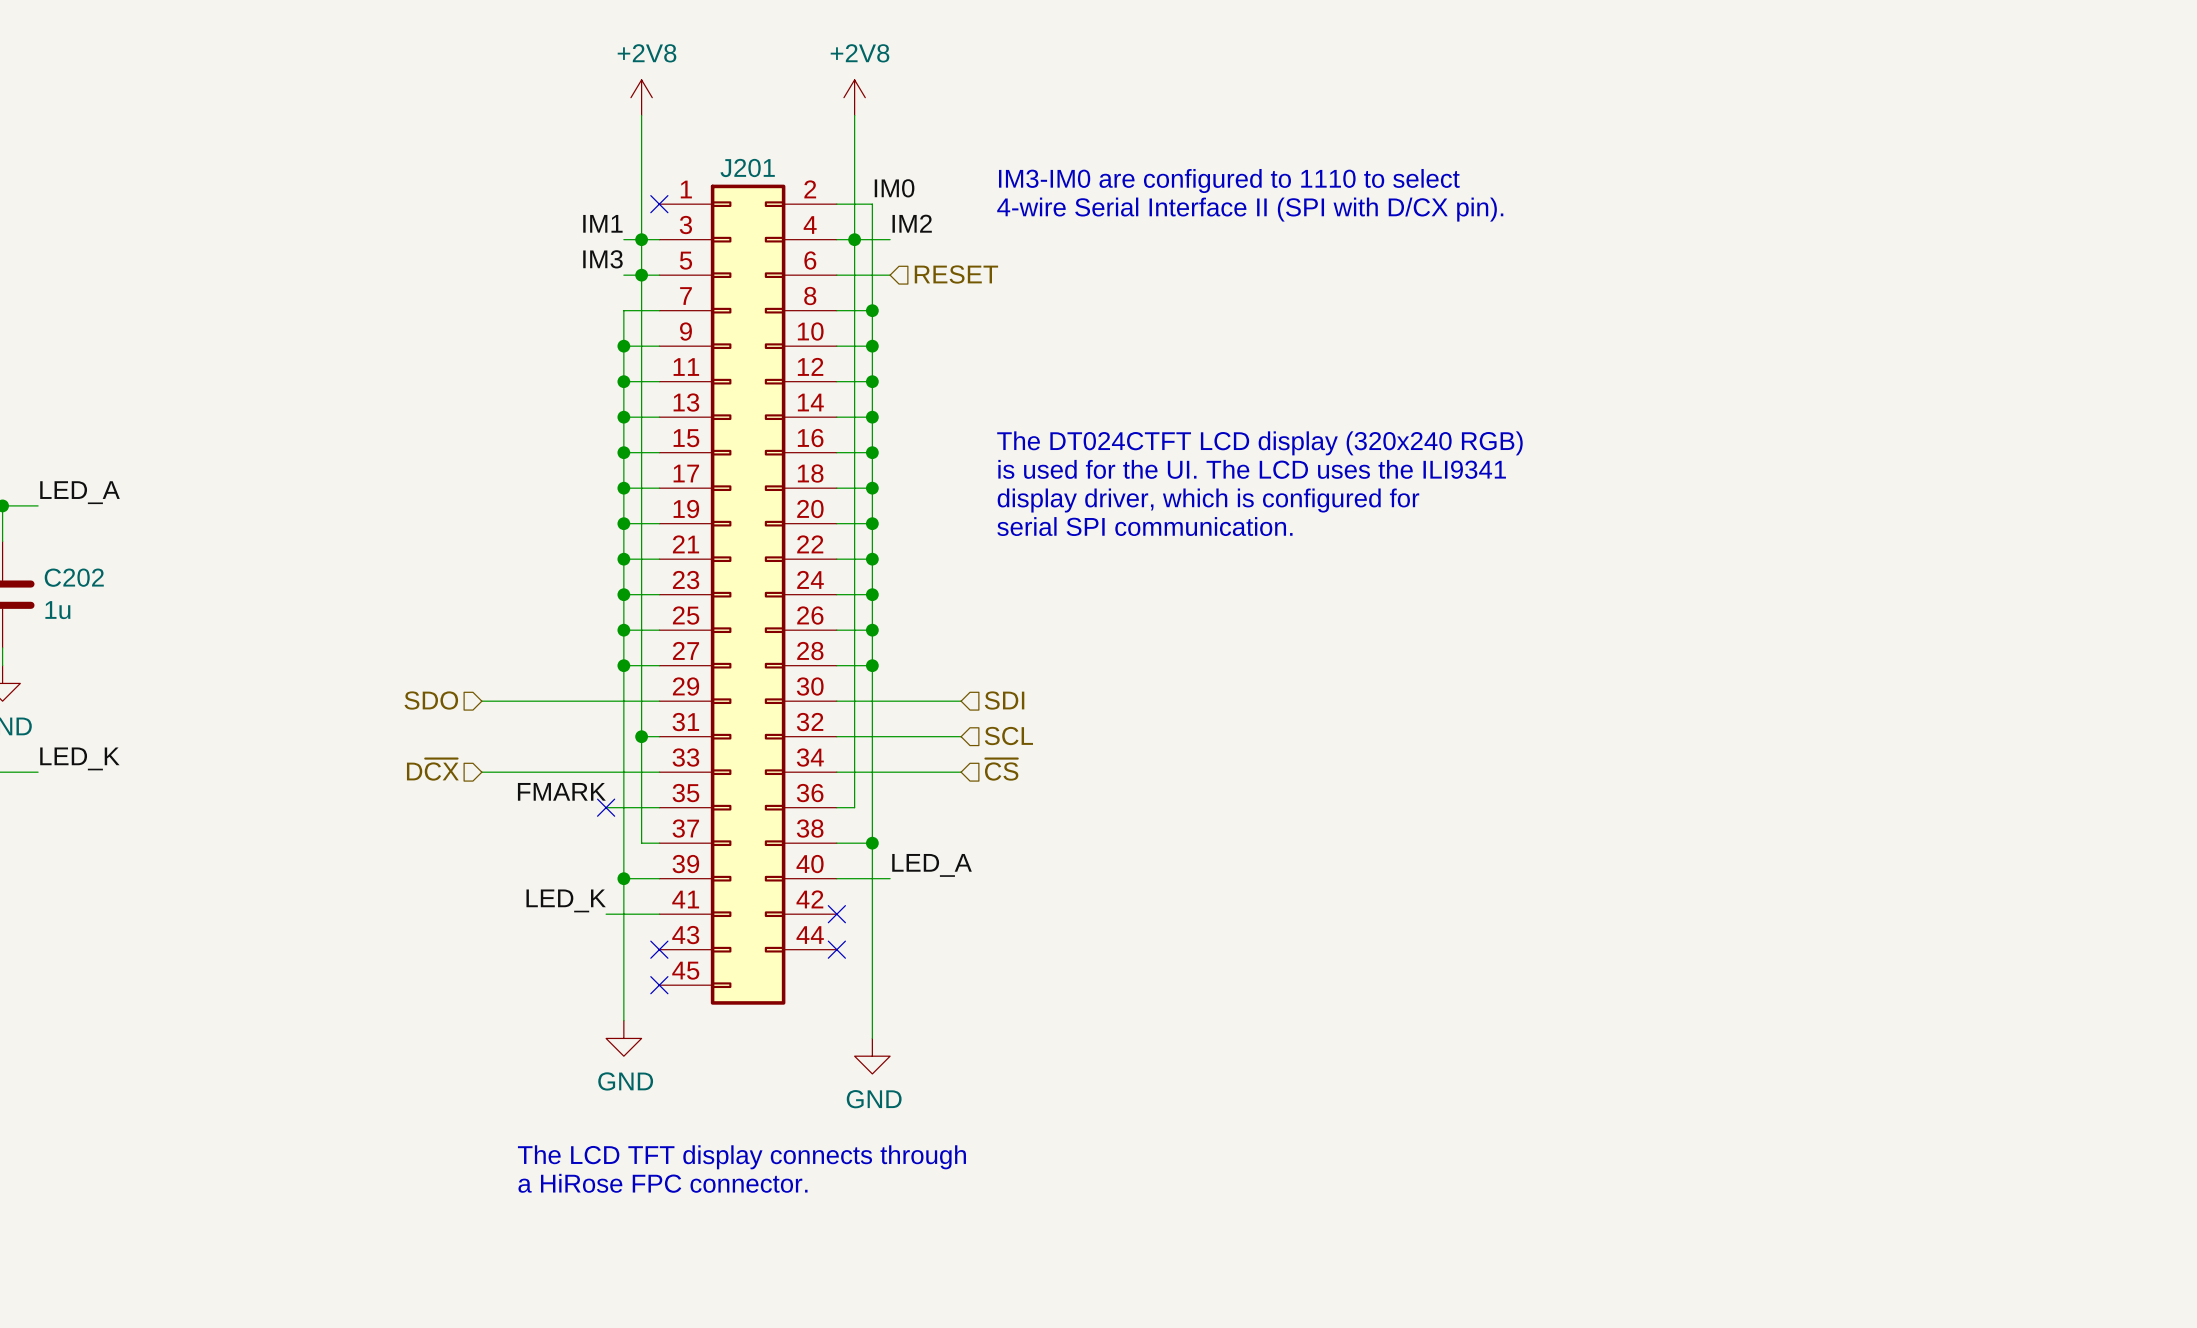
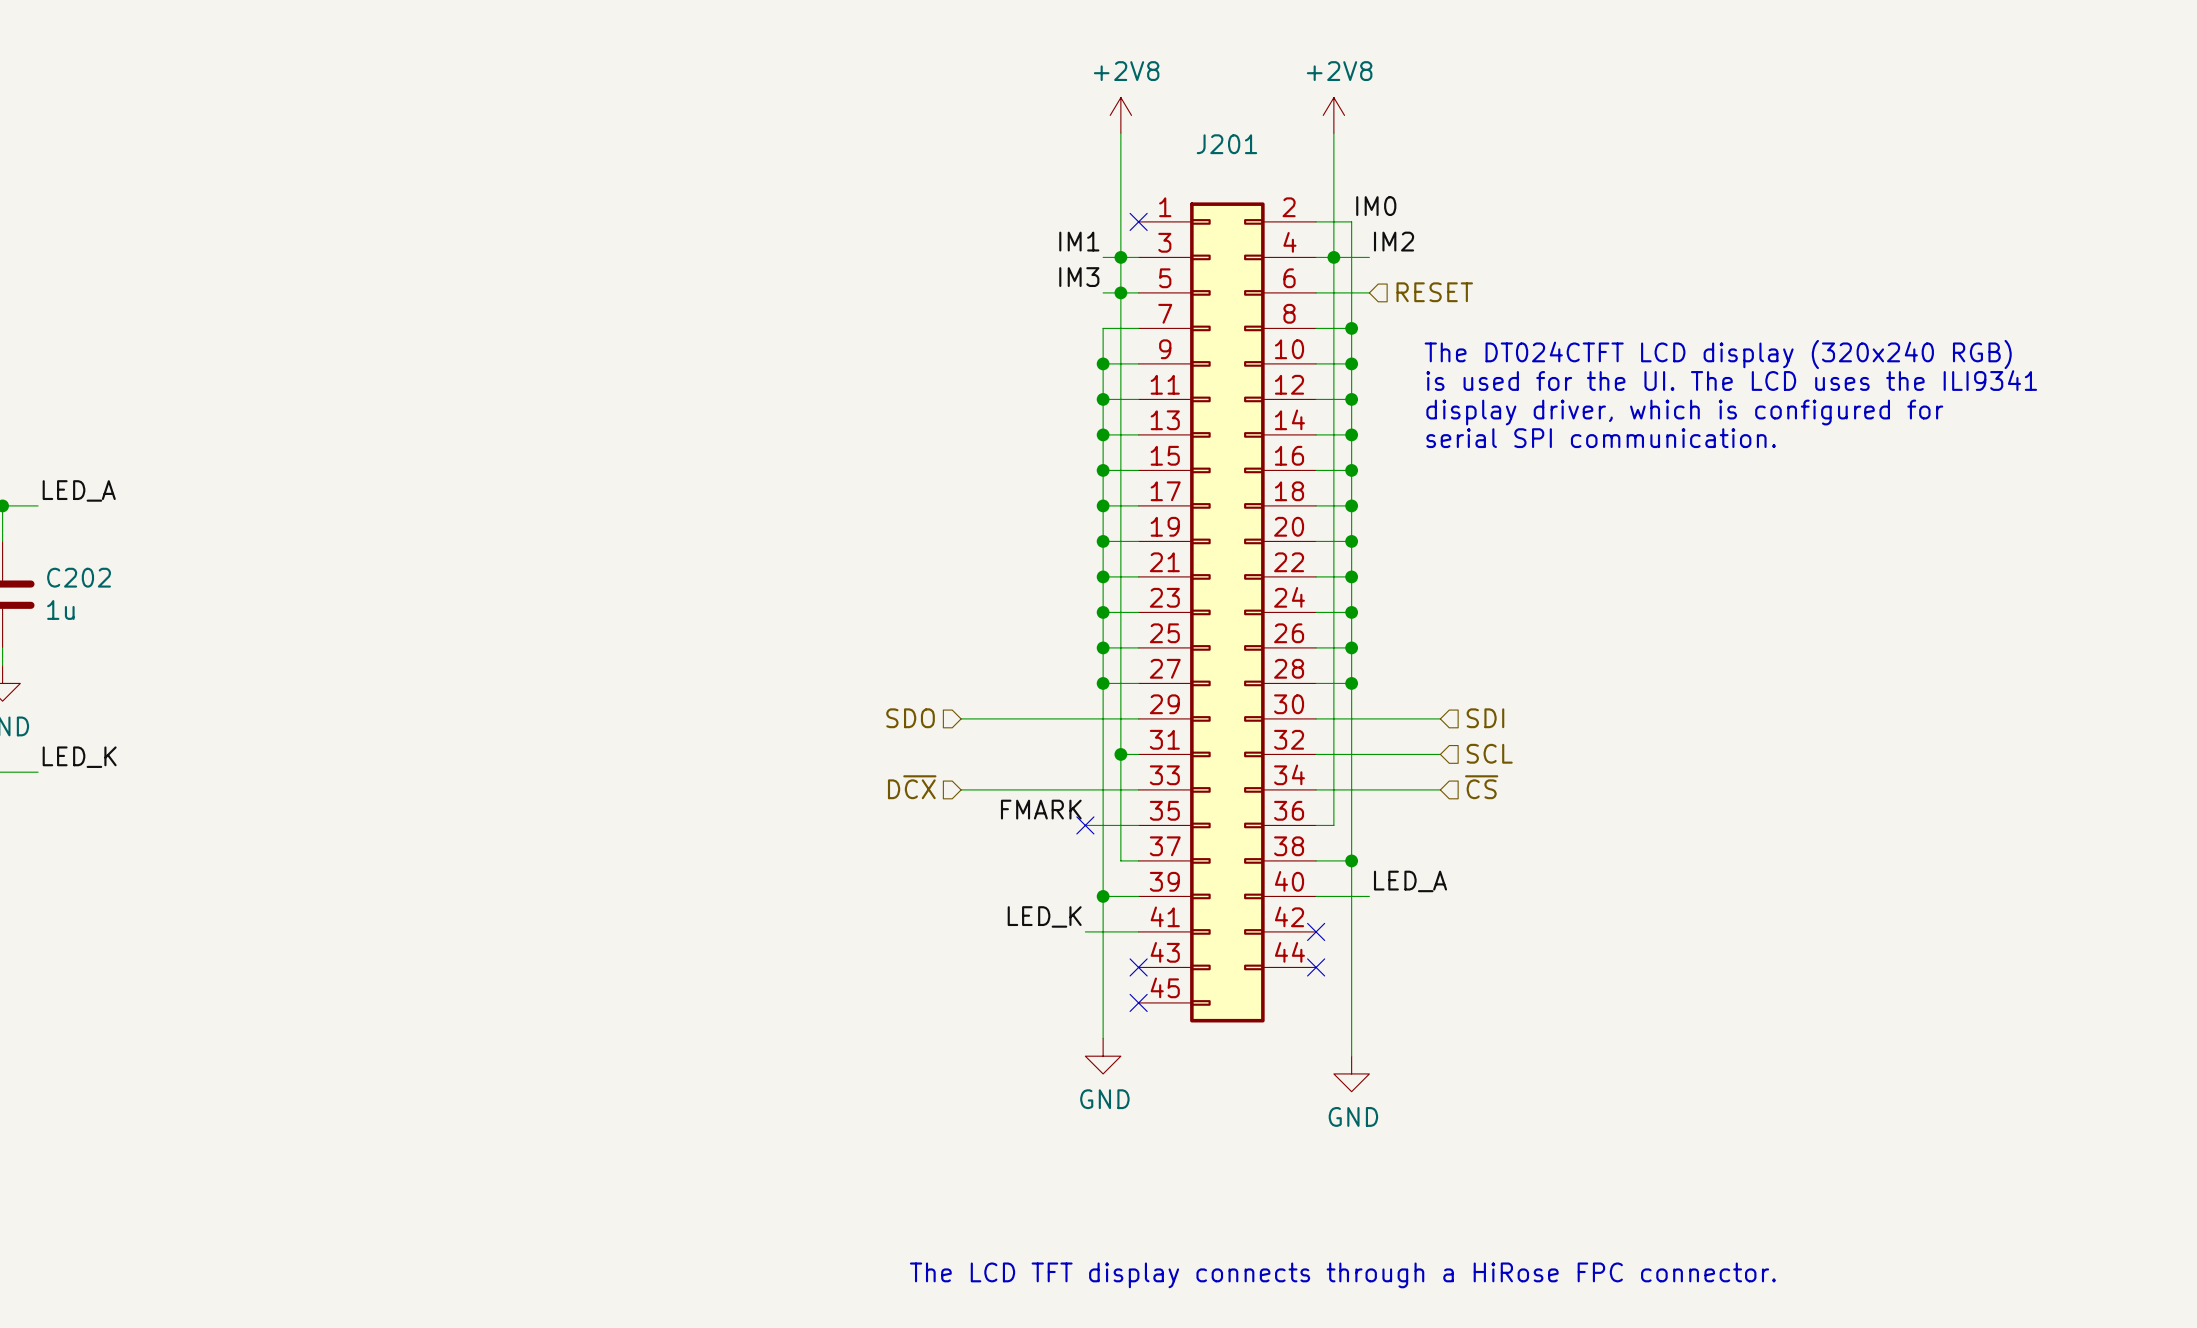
power symbol: +2V8 (641, 97) -> none
power symbol: +2V8 (854, 97) -> none
wire: (641, 115) (641, 843) (659, 843) -> none
wire: (854, 115) (854, 807) (836, 807) -> none
power symbol: none -> +2V8 (1120, 115)
power symbol: none -> +2V8 (1333, 115)
wire: none -> (1120, 133) (1120, 860) (1138, 860)
wire: none -> (1333, 133) (1333, 825) (1316, 825)
J201 name position: J201 (747, 167) -> J201 (1226, 144)
text: IM3-IM0 are configured to 1110 to select (1229, 181) -> none
label: IM0 (894, 188) -> none
no-connect mark: (659, 204) -> none
wire: (836, 204) (872, 204) (872, 1038) -> none
label: none -> IM0 (1376, 206)
text: 4-wire Serial Interface II (SPI with D/CX pin). (1250, 209) -> none
no-connect mark: none -> (1138, 221)
wire: none -> (1316, 221) (1351, 221) (1351, 1056)
label: IM1 (602, 223) -> none
label: IM2 (912, 223) -> none
wire: (623, 239) (659, 239) -> none
junction: (641, 239) -> none
wire: (836, 239) (890, 239) -> none
junction: (854, 239) -> none
label: none -> IM1 (1079, 241)
label: none -> IM2 (1394, 241)
wire: none -> (1103, 257) (1138, 257)
junction: none -> (1120, 257)
wire: none -> (1316, 257) (1369, 257)
junction: none -> (1333, 257)
label: IM3 (602, 259) -> none
hierarchical label: RESET (956, 274) -> none
wire: (623, 275) (659, 275) -> none
junction: (641, 275) -> none
wire: (836, 275) (890, 275) -> none
label: none -> IM3 (1079, 277)
wire: none -> (1103, 292) (1138, 292)
junction: none -> (1120, 292)
wire: none -> (1316, 292) (1369, 292)
hierarchical label: none -> RESET (1434, 292)
wire: (659, 310) (623, 310) (623, 1020) -> none
wire: (836, 310) (872, 310) -> (1103, 363) (1138, 363)
junction: (872, 310) -> none
wire: none -> (1138, 328) (1103, 328) (1103, 1038)
wire: none -> (1316, 328) (1351, 328)
junction: none -> (1351, 328)
wire: (623, 346) (659, 346) -> none
junction: (623, 346) -> none
wire: (836, 346) (872, 346) -> (1103, 399) (1138, 399)
junction: (872, 346) -> none
text: none -> The DT024CTFT LCD display (320x240 RGB) (1718, 354)
junction: none -> (1103, 363)
wire: none -> (1316, 363) (1351, 363)
junction: none -> (1351, 363)
text: none -> is used for the UI. The LCD uses the ILI9341 (1731, 380)
wire: (623, 381) (659, 381) -> none
junction: (623, 381) -> none
wire: (836, 381) (872, 381) -> (1103, 434) (1138, 434)
junction: (872, 381) -> none
junction: none -> (1103, 399)
wire: none -> (1316, 399) (1351, 399)
junction: none -> (1351, 399)
text: none -> display driver, which is configured for (1684, 412)
wire: (623, 417) (659, 417) -> none
junction: (623, 417) -> none
wire: (836, 417) (872, 417) -> (1103, 470) (1138, 470)
junction: (872, 417) -> none
junction: none -> (1103, 434)
wire: none -> (1316, 434) (1351, 434)
junction: none -> (1351, 434)
text: none -> serial SPI communication. (1601, 438)
text: The DT024CTFT LCD display (320x240 RGB) (1259, 443) -> none
wire: (623, 452) (659, 452) -> none
junction: (623, 452) -> none
wire: (836, 452) (872, 452) -> (1103, 505) (1138, 505)
junction: (872, 452) -> none
text: is used for the UI. The LCD uses the ILI9341 (1252, 469) -> none
junction: none -> (1103, 470)
wire: none -> (1316, 470) (1351, 470)
junction: none -> (1351, 470)
wire: (623, 488) (659, 488) -> none
junction: (623, 488) -> none
wire: (836, 488) (872, 488) -> (1103, 541) (1138, 541)
junction: (872, 488) -> none
text: display driver, which is configured for (1208, 500) -> none
junction: none -> (1103, 505)
wire: none -> (1316, 505) (1351, 505)
junction: none -> (1351, 505)
wire: (623, 523) (659, 523) -> none
junction: (623, 523) -> none
wire: (836, 523) (872, 523) -> (1103, 576) (1138, 576)
junction: (872, 523) -> none
text: serial SPI communication. (1144, 526) -> none
junction: none -> (1103, 541)
wire: none -> (1316, 541) (1351, 541)
junction: none -> (1351, 541)
wire: (623, 559) (659, 559) -> none
junction: (623, 559) -> none
wire: (836, 559) (872, 559) -> (1103, 612) (1138, 612)
junction: (872, 559) -> none
junction: none -> (1103, 576)
wire: none -> (1316, 576) (1351, 576)
junction: none -> (1351, 576)
wire: (623, 594) (659, 594) -> none
junction: (623, 594) -> none
J201 position: (748, 594) -> (1227, 612)
wire: (836, 594) (872, 594) -> (1103, 647) (1138, 647)
junction: (872, 594) -> none
junction: none -> (1103, 612)
wire: none -> (1316, 612) (1351, 612)
junction: none -> (1351, 612)
wire: (623, 630) (659, 630) -> none
junction: (623, 630) -> none
wire: (836, 630) (872, 630) -> (1103, 683) (1138, 683)
junction: (872, 630) -> none
junction: none -> (1103, 647)
wire: none -> (1316, 647) (1351, 647)
junction: none -> (1351, 647)
wire: (623, 665) (659, 665) -> none
junction: (623, 665) -> none
wire: (836, 665) (872, 665) -> none
junction: (872, 665) -> none
junction: none -> (1103, 683)
wire: none -> (1316, 683) (1351, 683)
junction: none -> (1351, 683)
hierarchical label: SDO (431, 700) -> none
hierarchical label: SDI (1004, 700) -> none
wire: (481, 701) (659, 701) -> none
wire: (836, 701) (961, 701) -> none
hierarchical label: none -> SDO (910, 718)
wire: none -> (961, 718) (1138, 718)
wire: none -> (1316, 718) (1440, 718)
hierarchical label: none -> SDI (1485, 718)
wire: (641, 736) (659, 736) -> none
junction: (641, 736) -> none
wire: (836, 736) (961, 736) -> none
hierarchical label: SCL (1008, 736) -> none
hierarchical label: none -> SCL (1489, 753)
wire: none -> (1120, 754) (1138, 754)
junction: none -> (1120, 754)
wire: none -> (1316, 754) (1440, 754)
hierarchical label: D~{CX} (432, 769) -> none
hierarchical label: ~{CS} (1001, 769) -> none
wire: (481, 772) (659, 772) -> none
wire: (836, 772) (961, 772) -> none
hierarchical label: none -> D~{CX} (912, 787)
hierarchical label: none -> ~{CS} (1481, 787)
wire: none -> (961, 789) (1138, 789)
wire: none -> (1316, 789) (1440, 789)
label: FMARK (561, 791) -> none
wire: (606, 807) (659, 807) -> none
no-connect mark: (606, 807) -> none
label: none -> FMARK (1041, 809)
no-connect mark: none -> (1085, 825)
wire: (836, 843) (872, 843) -> (1103, 896) (1138, 896)
junction: (872, 843) -> none
wire: none -> (1316, 860) (1351, 860)
junction: none -> (1351, 860)
label: LED_A (932, 865) -> none
wire: (623, 878) (659, 878) -> none
junction: (623, 878) -> none
wire: (836, 878) (890, 878) -> (1085, 825) (1138, 825)
label: none -> LED_A (1410, 881)
junction: none -> (1103, 896)
wire: none -> (1316, 896) (1369, 896)
label: LED_K (566, 900) -> none
wire: (606, 914) (659, 914) -> none
no-connect mark: (836, 914) -> none
label: none -> LED_K (1044, 916)
wire: none -> (1085, 931) (1138, 931)
no-connect mark: none -> (1316, 931)
no-connect mark: (659, 949) -> none
no-connect mark: (836, 949) -> none
no-connect mark: none -> (1138, 967)
no-connect mark: none -> (1316, 967)
no-connect mark: (659, 985) -> none
no-connect mark: none -> (1138, 1002)
power symbol: GND (623, 1038) -> none
power symbol position: GND (872, 1056) -> GND (1103, 1056)
power symbol: none -> GND (1351, 1073)
text: The LCD TFT display connects through (741, 1157) -> none
text: a HiRose FPC connector. (662, 1183) -> none
text: none -> The LCD TFT display connects through a HiRose FPC connector. (1342, 1275)

